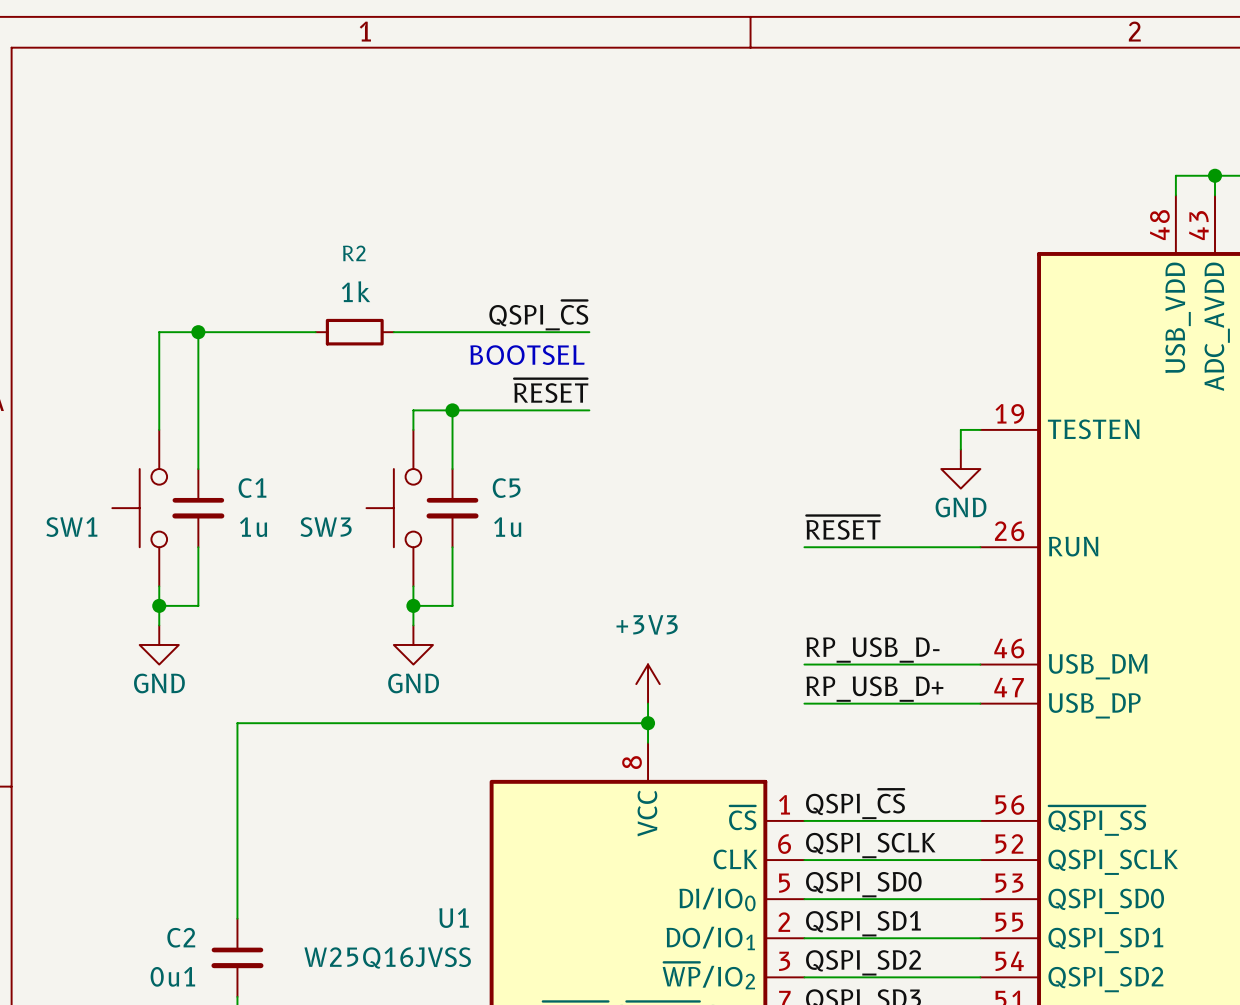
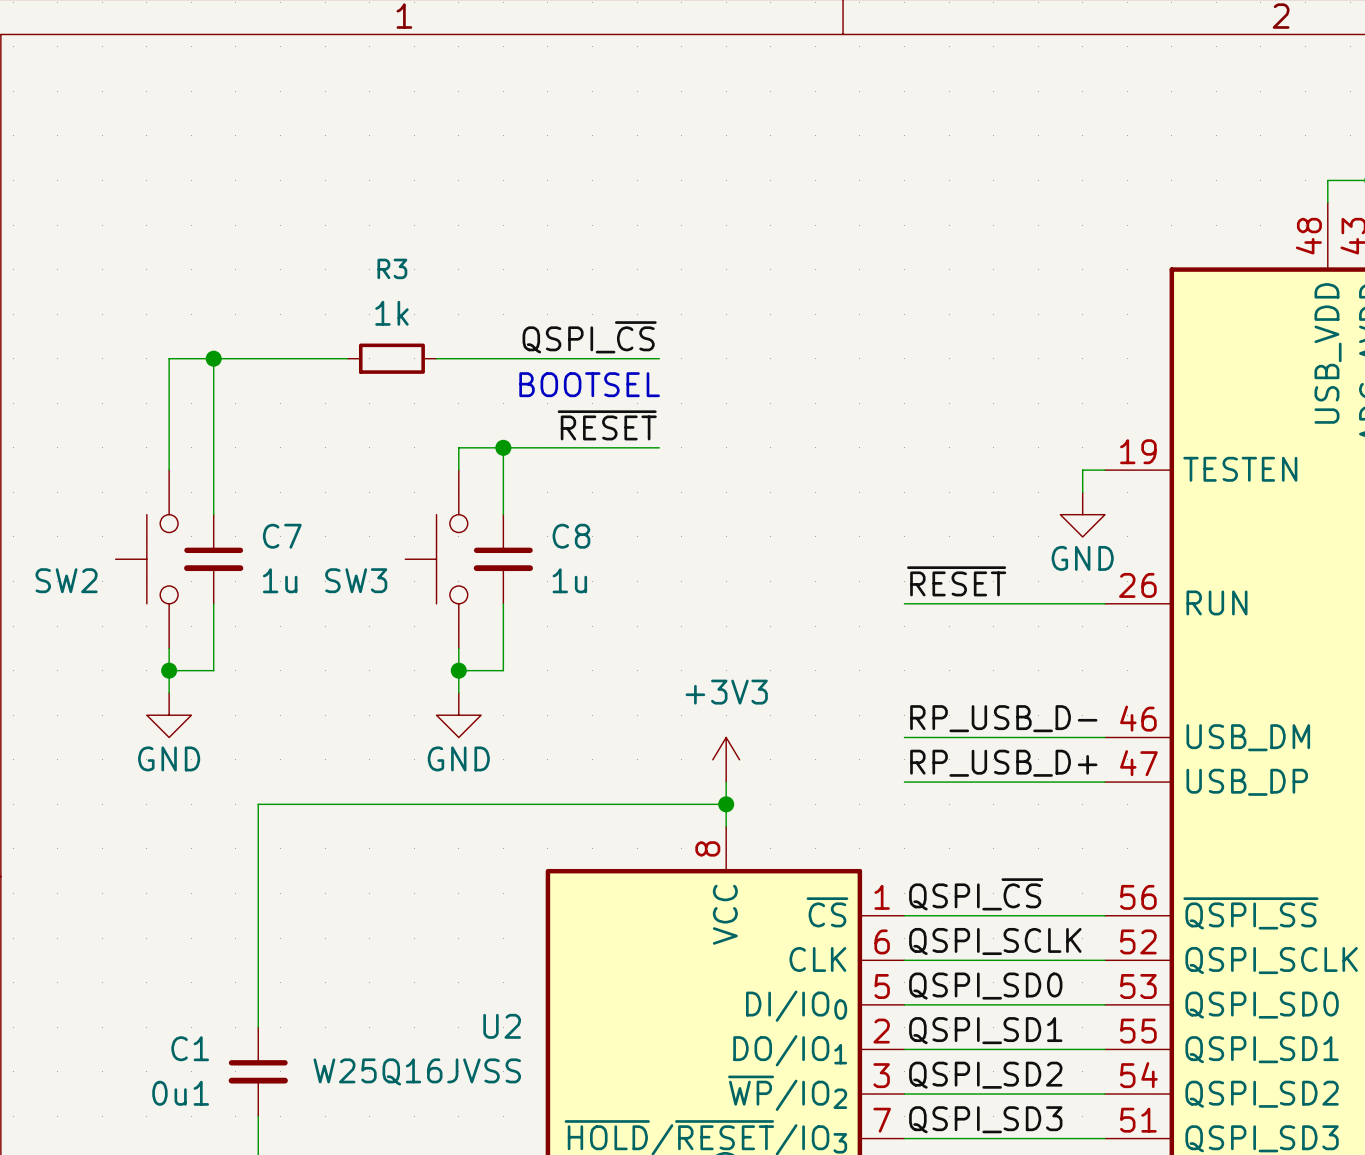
R2 name: R2 (354, 253) -> R3 (392, 268)
C1 name: C1 (252, 488) -> C7 (282, 536)
C5 name: C5 (506, 488) -> C8 (571, 536)
SW1 name: SW1 (71, 527) -> SW2 (66, 580)
U1 name: U1 (454, 918) -> U2 (502, 1026)
C2 name: C2 (181, 937) -> C1 (190, 1048)

